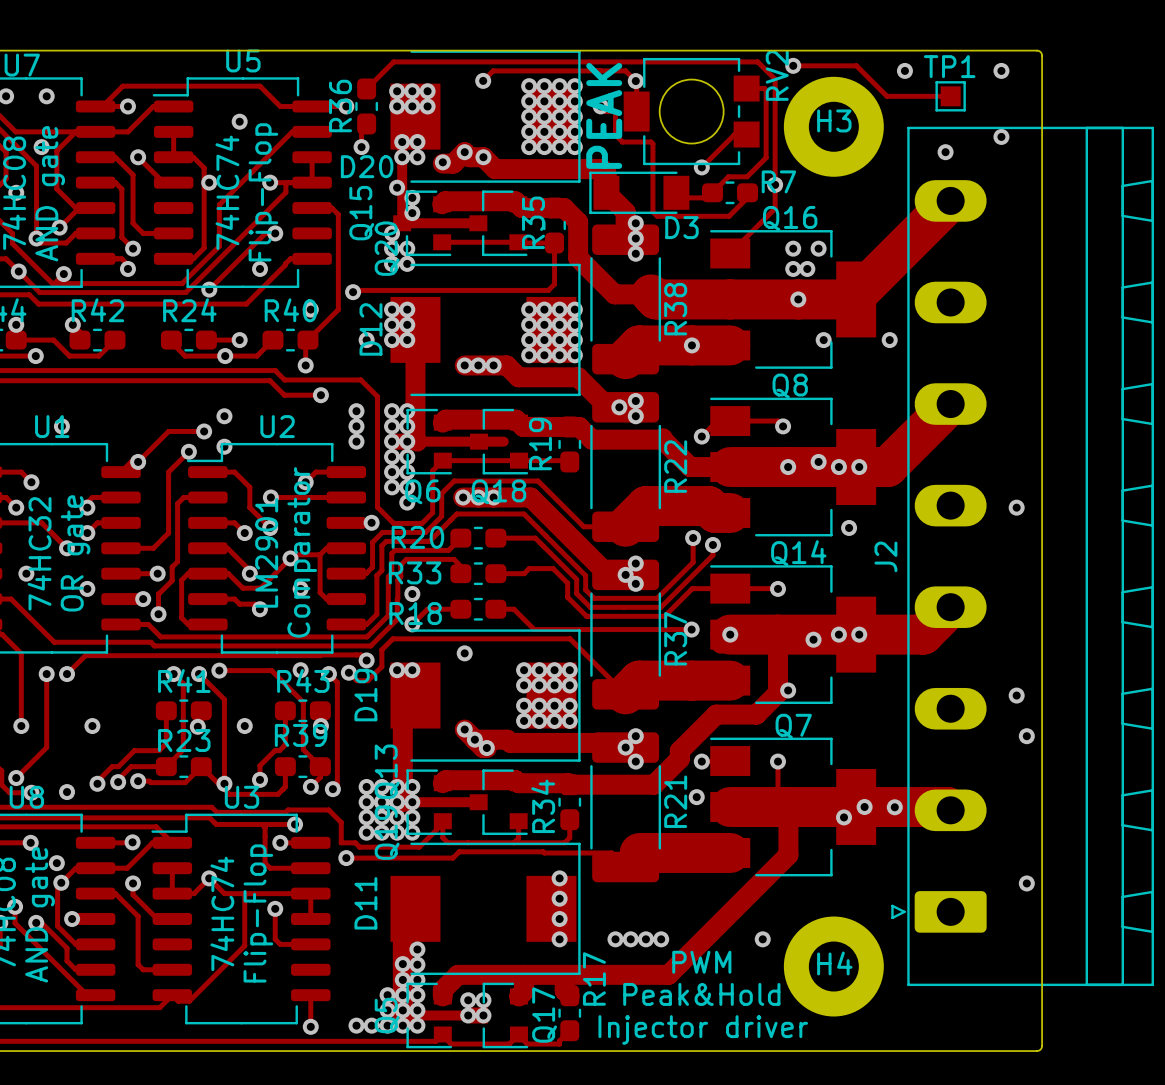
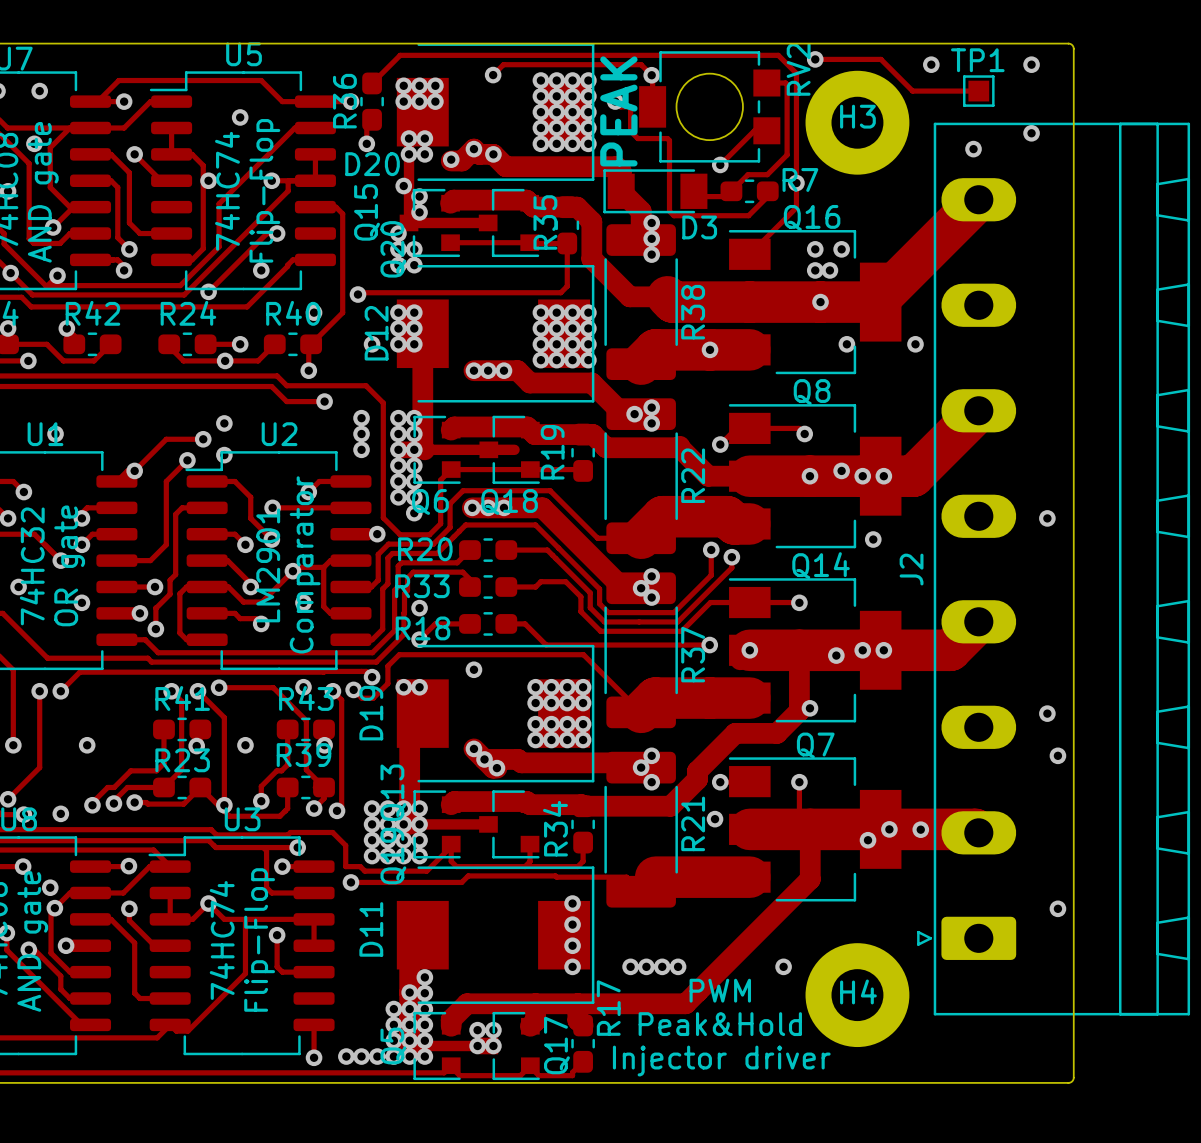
via: (36, 238) -> none
via: none -> (393, 1009)
via: none -> (346, 1056)

